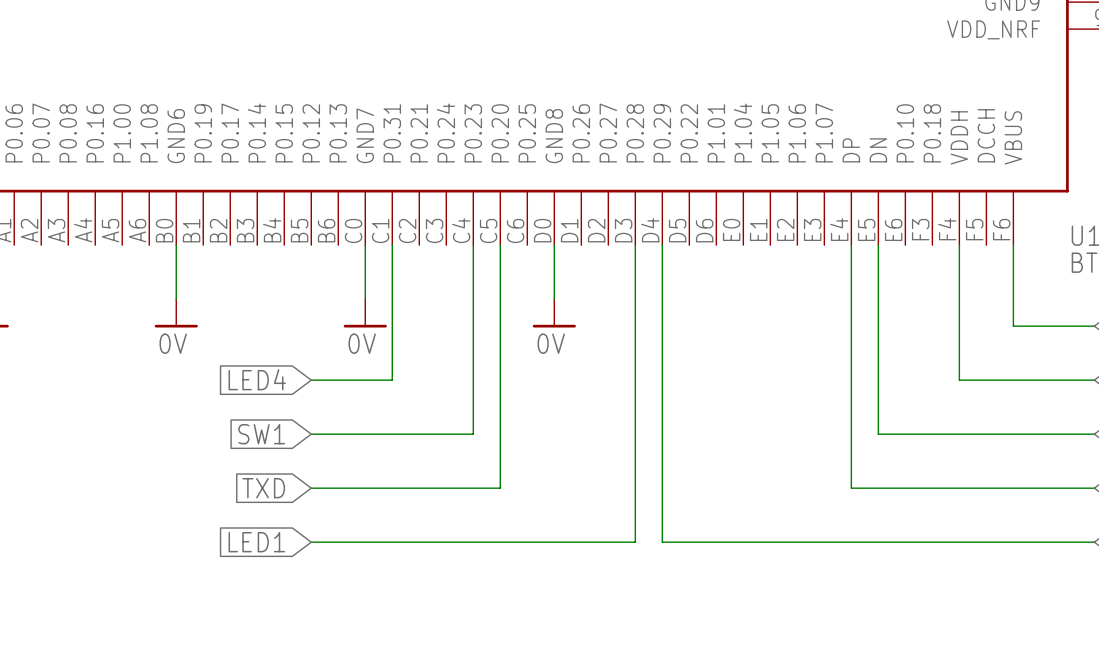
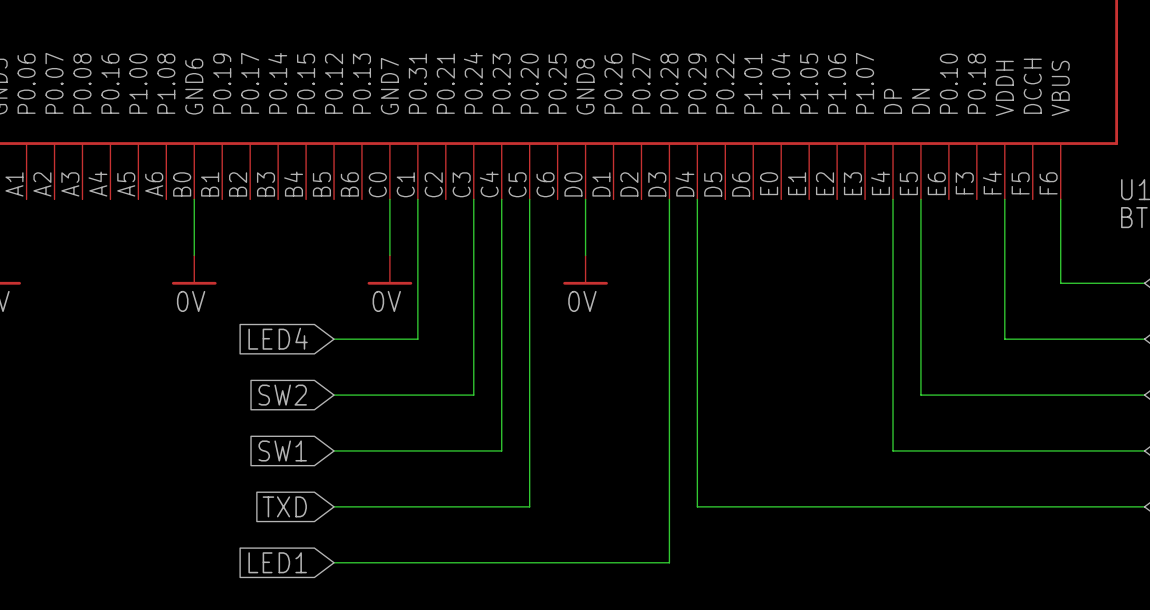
wire: none -> (473, 199) (473, 395)
global label: SW1 (261, 434) -> SW2 (282, 395)
wire: (446, 434) (473, 434) -> (501, 450) (501, 395)
global label: TXD (263, 488) -> SW1 (282, 450)
wire: (473, 488) (500, 488) -> (529, 506) (529, 450)
global label: LED1 (256, 542) -> TXD (284, 506)
wire: (500, 542) (635, 542) -> (334, 562) (669, 562) (669, 506)
global label: none -> LED1 (277, 562)

